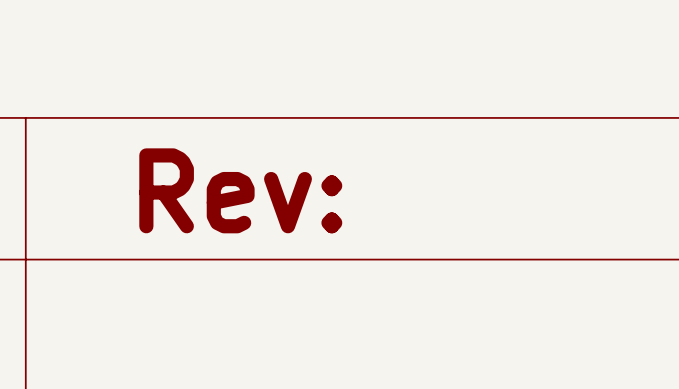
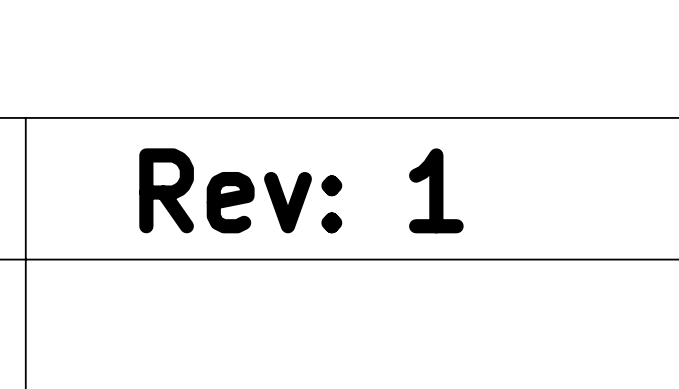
title block: Rev: (240, 190) -> Rev: 1 (301, 190)

